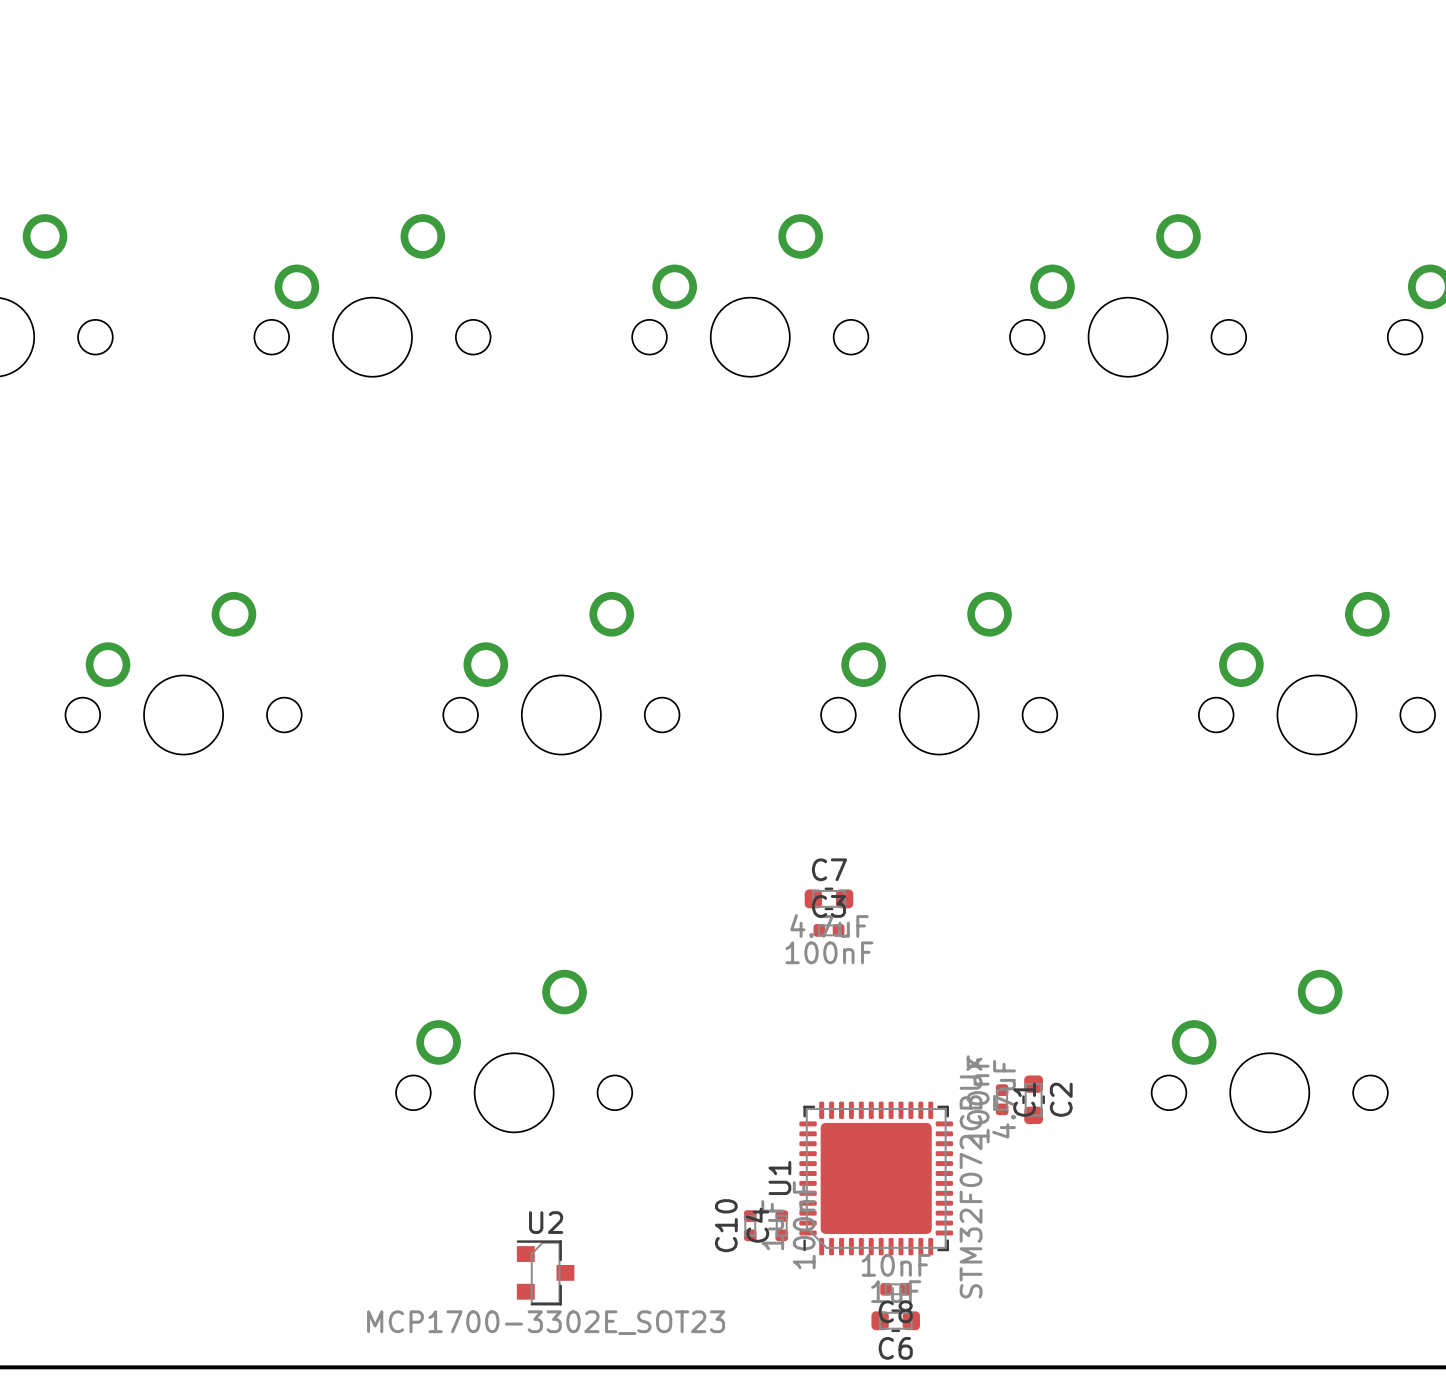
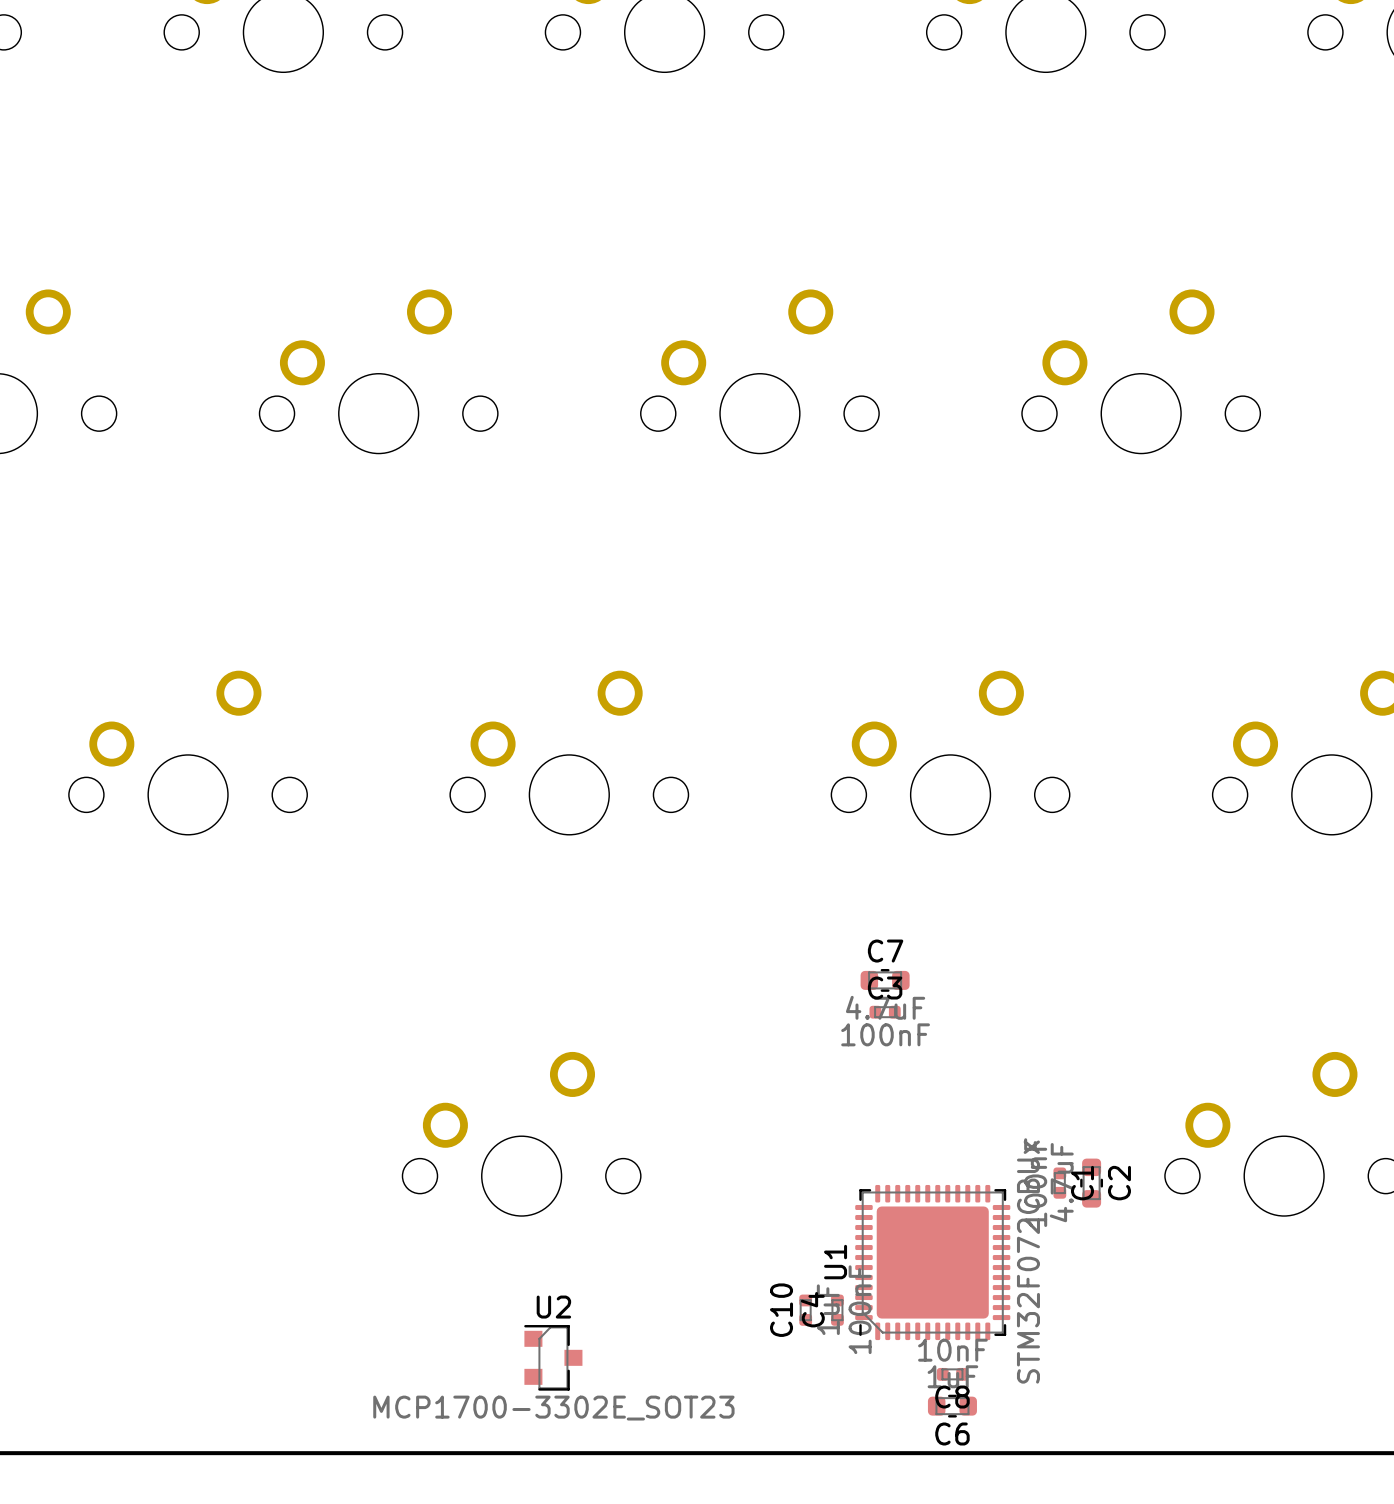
C7 position: (828, 898) -> (885, 980)
C3 position: (828, 930) -> (885, 1012)
C1 position: (1002, 1099) -> (1059, 1183)
C2 position: (1033, 1099) -> (1091, 1183)
U1 position: (876, 1178) -> (932, 1262)
C10 position: (750, 1225) -> (805, 1310)
C4 position: (781, 1225) -> (837, 1310)
C8 position: (895, 1289) -> (952, 1374)
C6 position: (895, 1320) -> (952, 1406)

